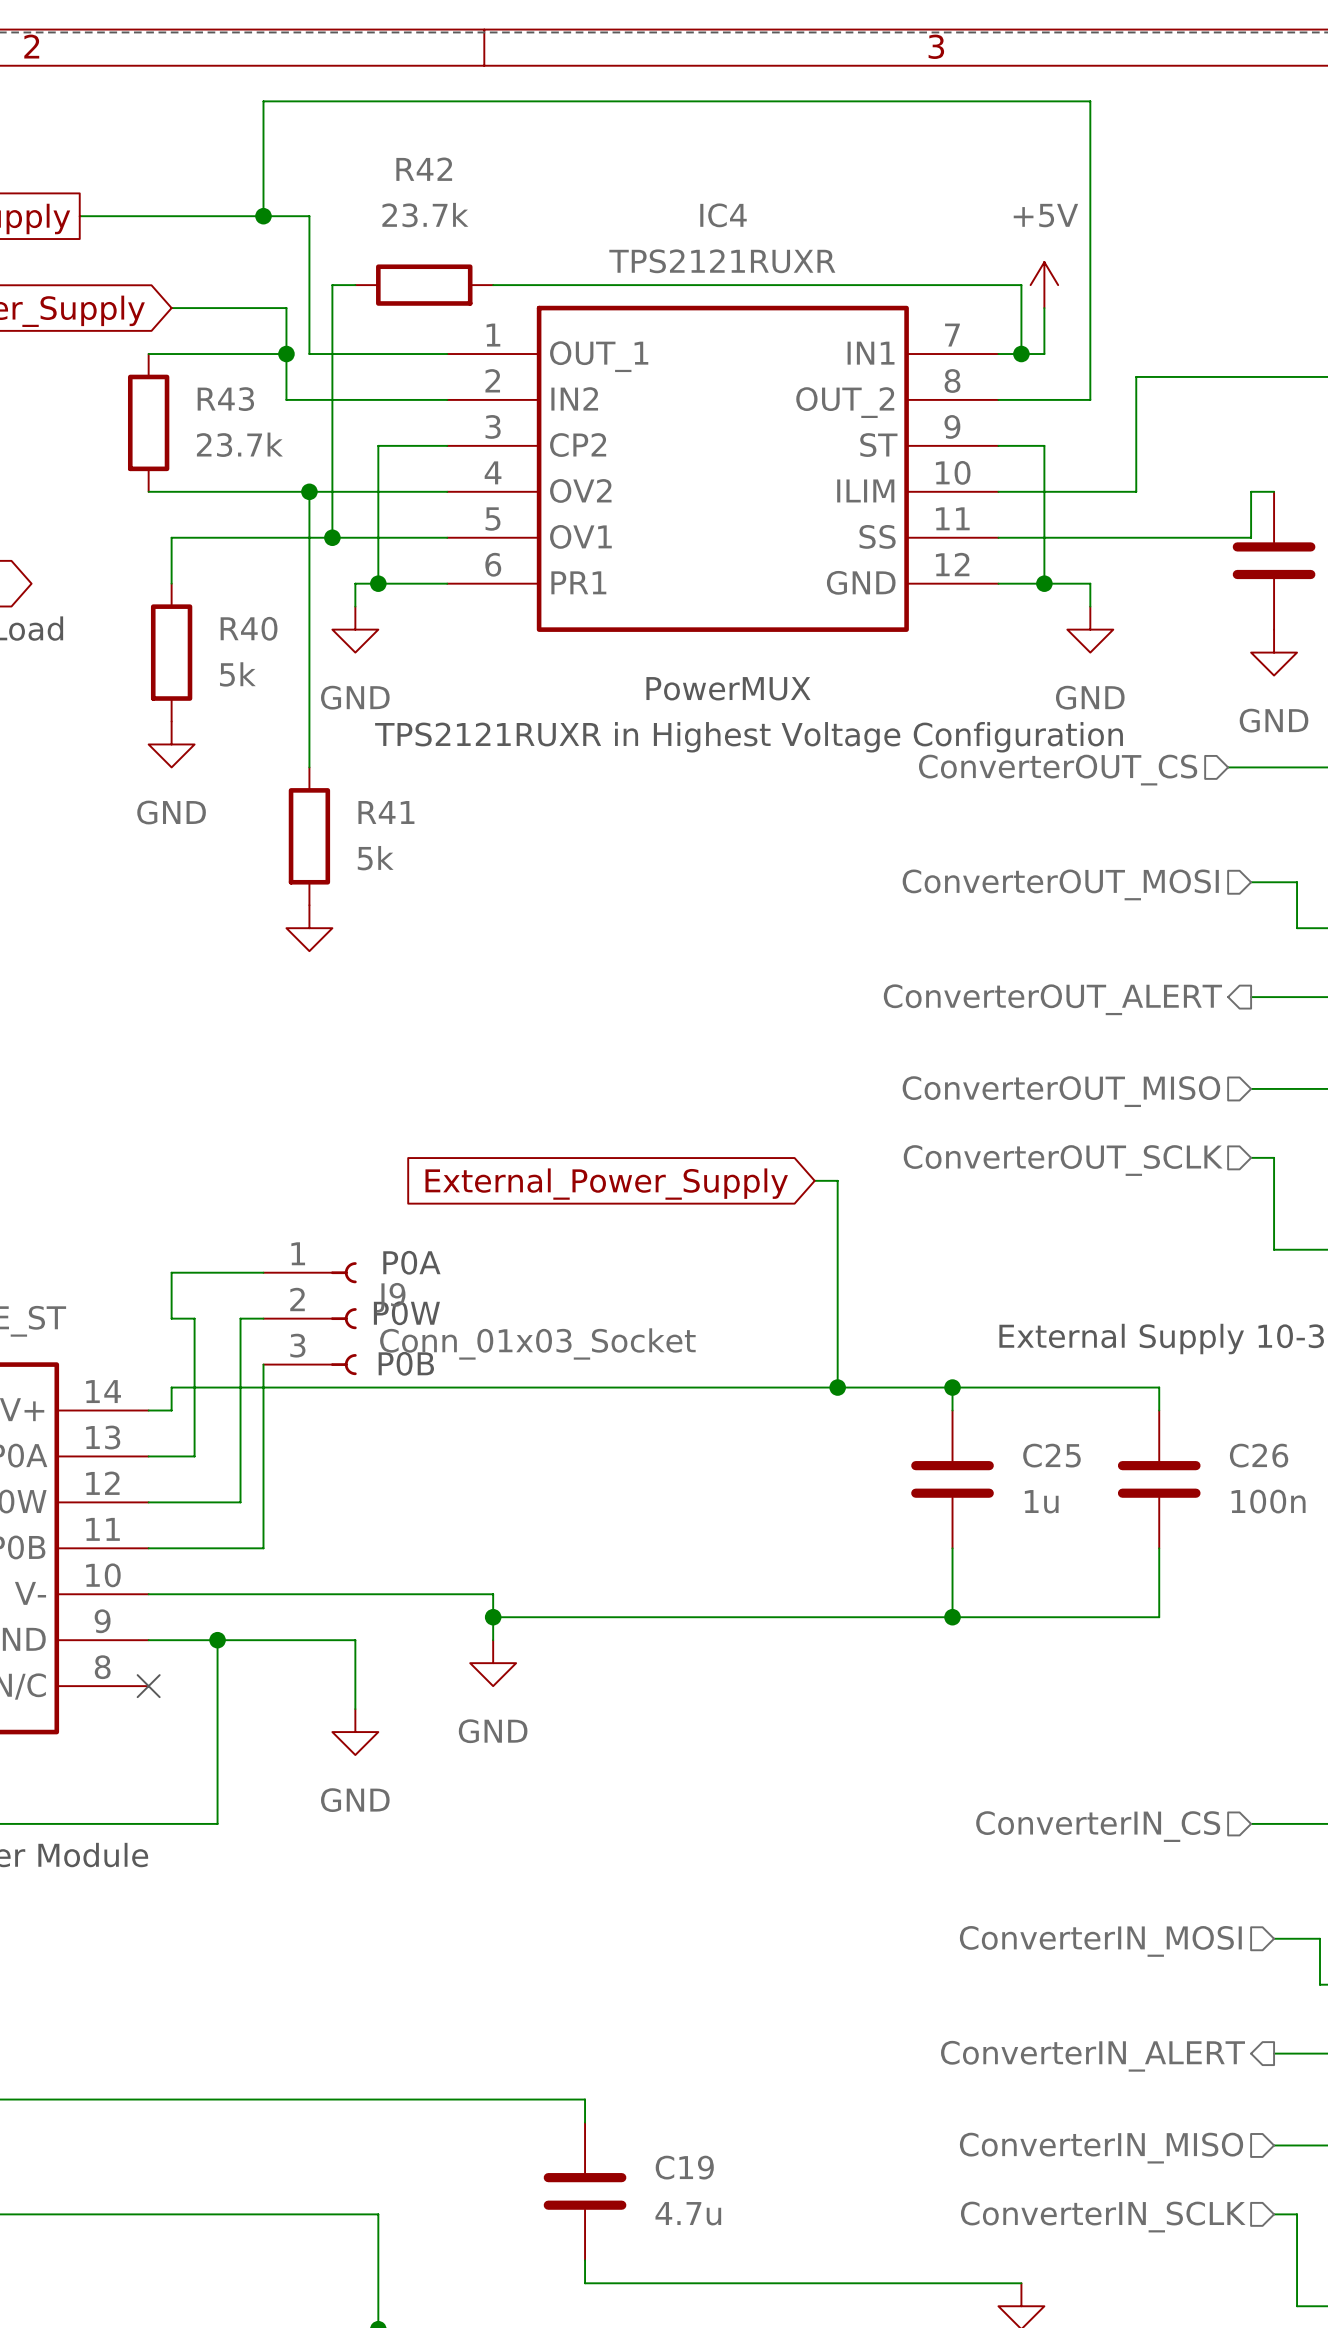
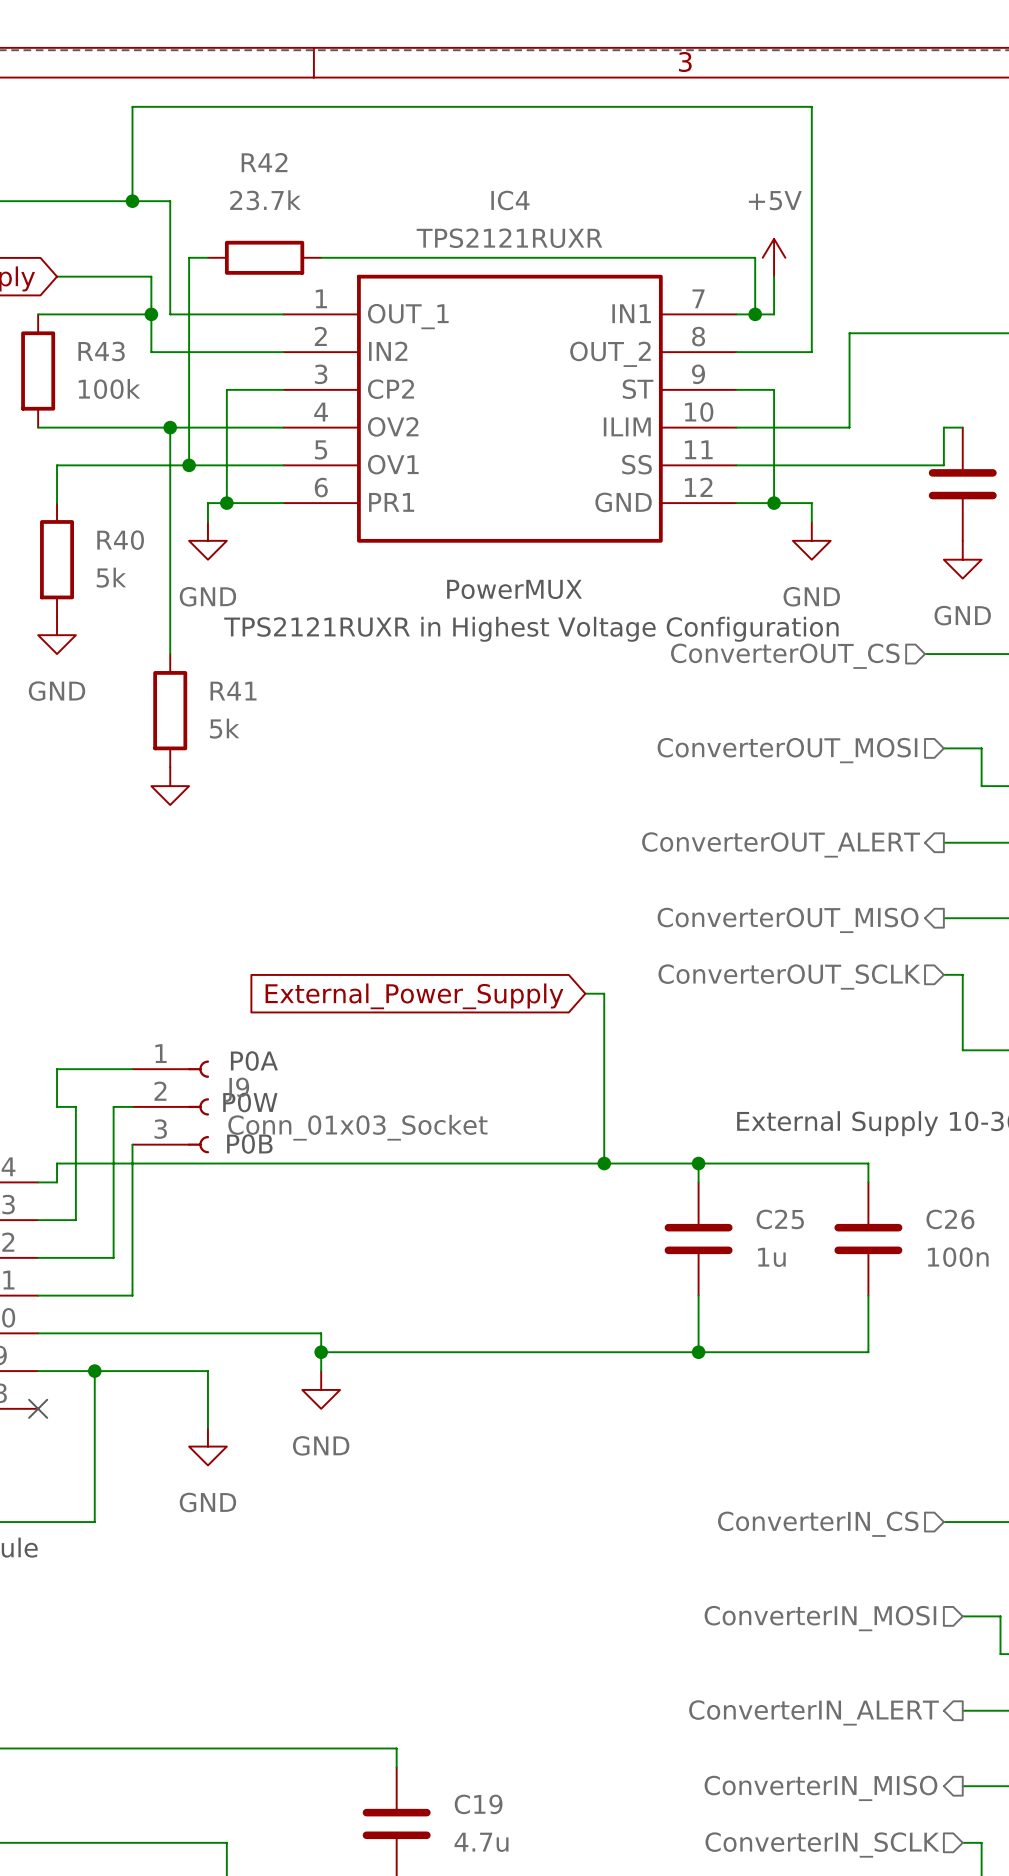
R43 value: 23.7k (239, 444) -> 100k (109, 388)
hierarchical label shape: input (1061, 1091) -> output (788, 920)
hierarchical label shape: input (1101, 2148) -> output (820, 1788)

